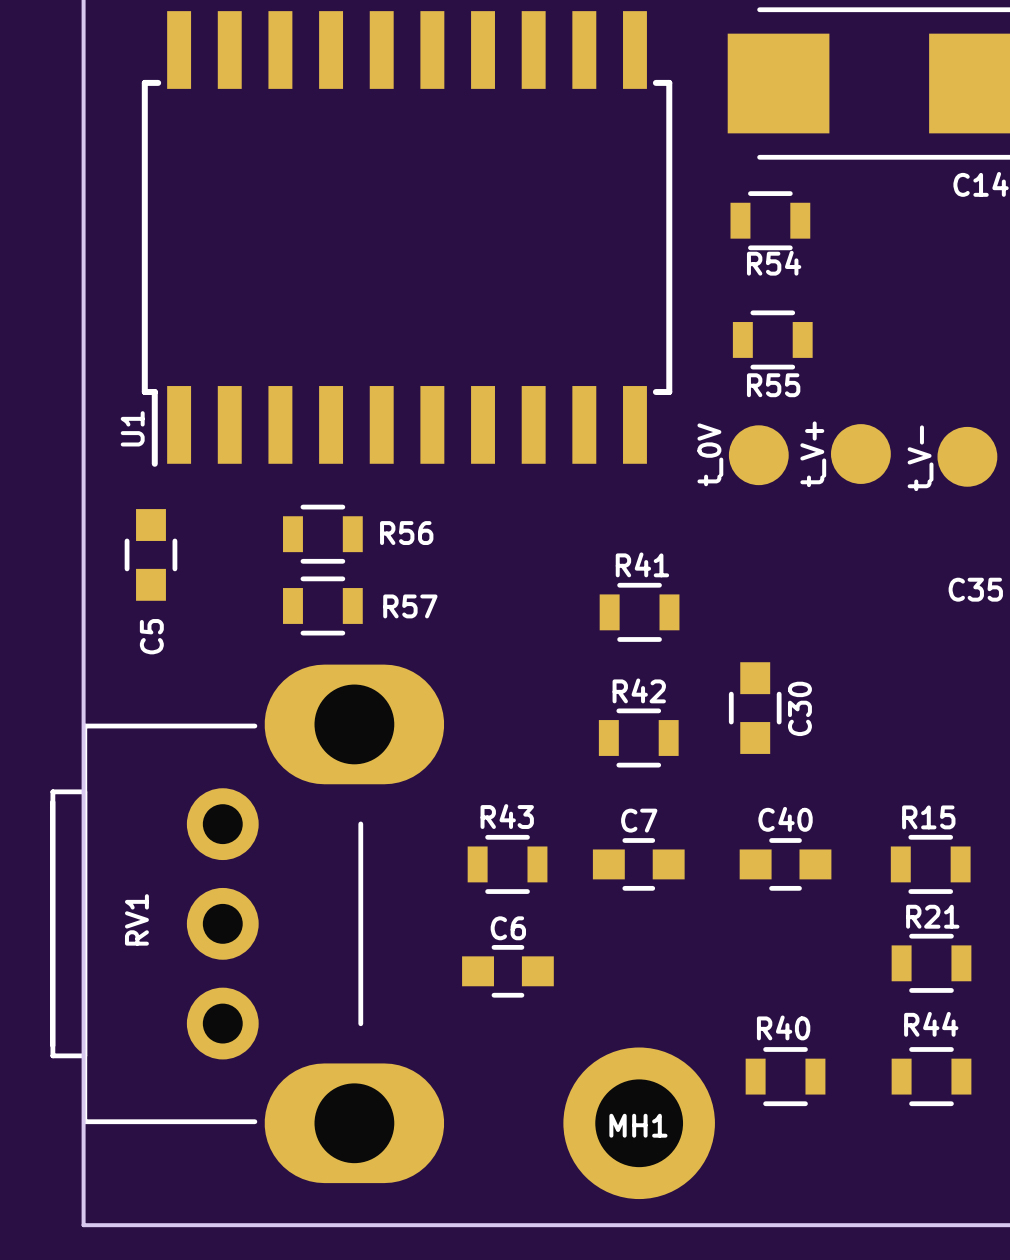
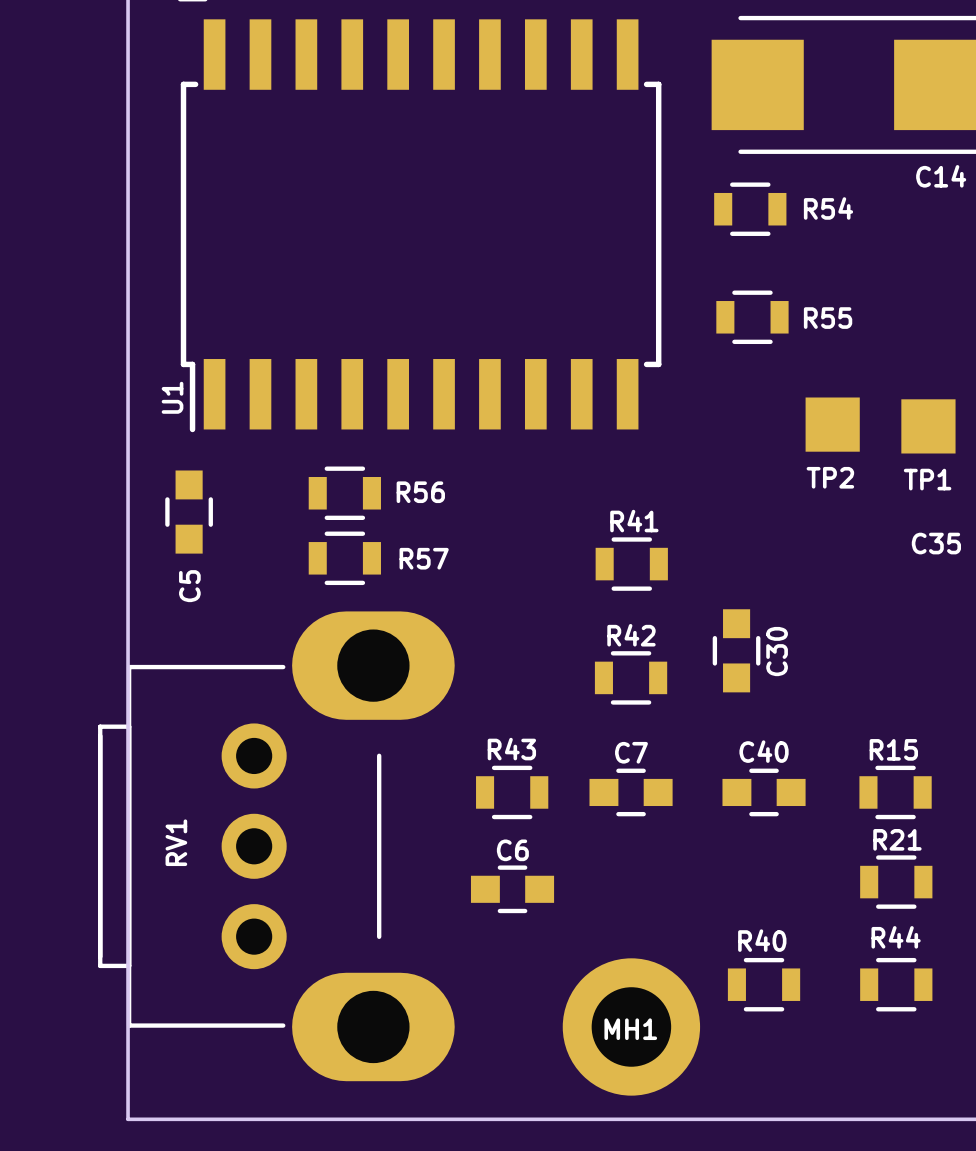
R54 name position: R54 (774, 263) -> R54 (828, 208)
R55 name position: R55 (773, 385) -> R55 (828, 318)
t_V+: (860, 454) -> none
t_0V: (758, 455) -> none
t_V-: (967, 456) -> none
TP2: none -> (832, 424)
TP1: none -> (928, 426)

